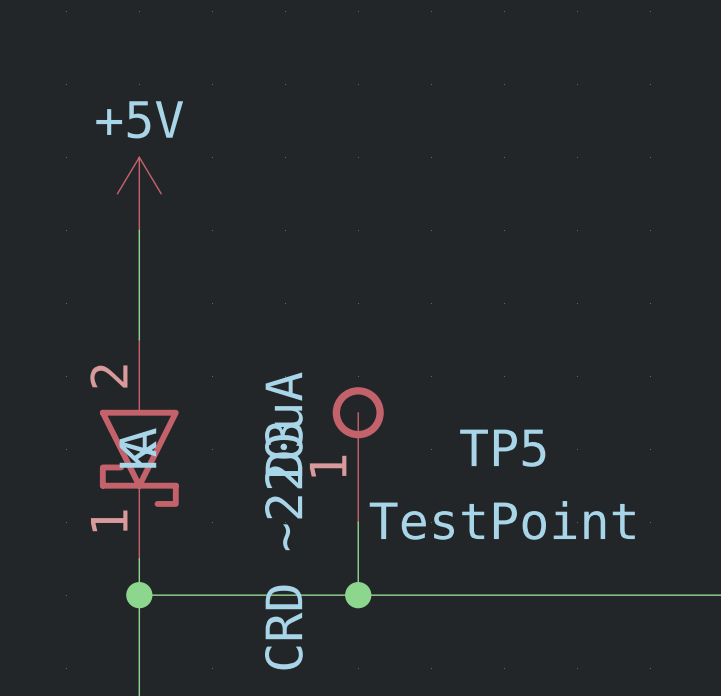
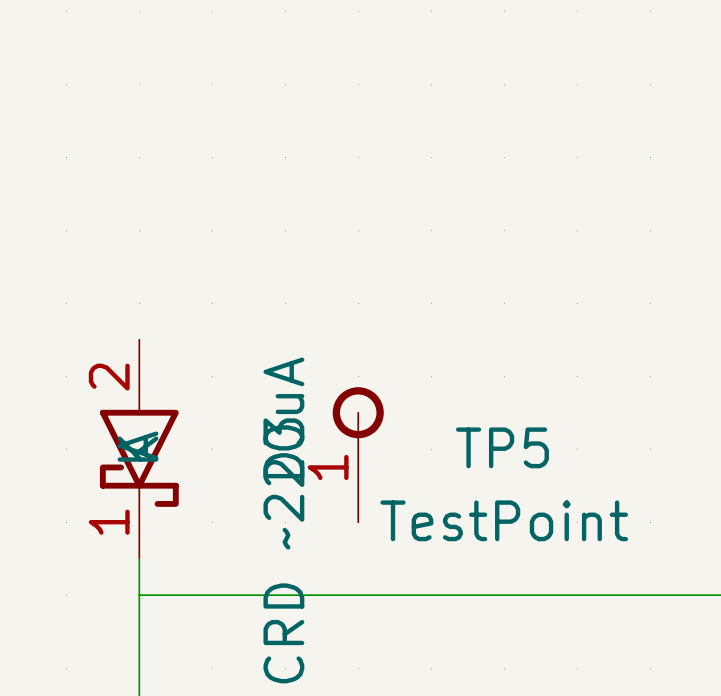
power symbol: +5V (139, 193) -> none
wire: (139, 230) (139, 339) -> none
wire: (358, 522) (358, 595) -> none
junction: (139, 595) -> none
junction: (358, 595) -> none

